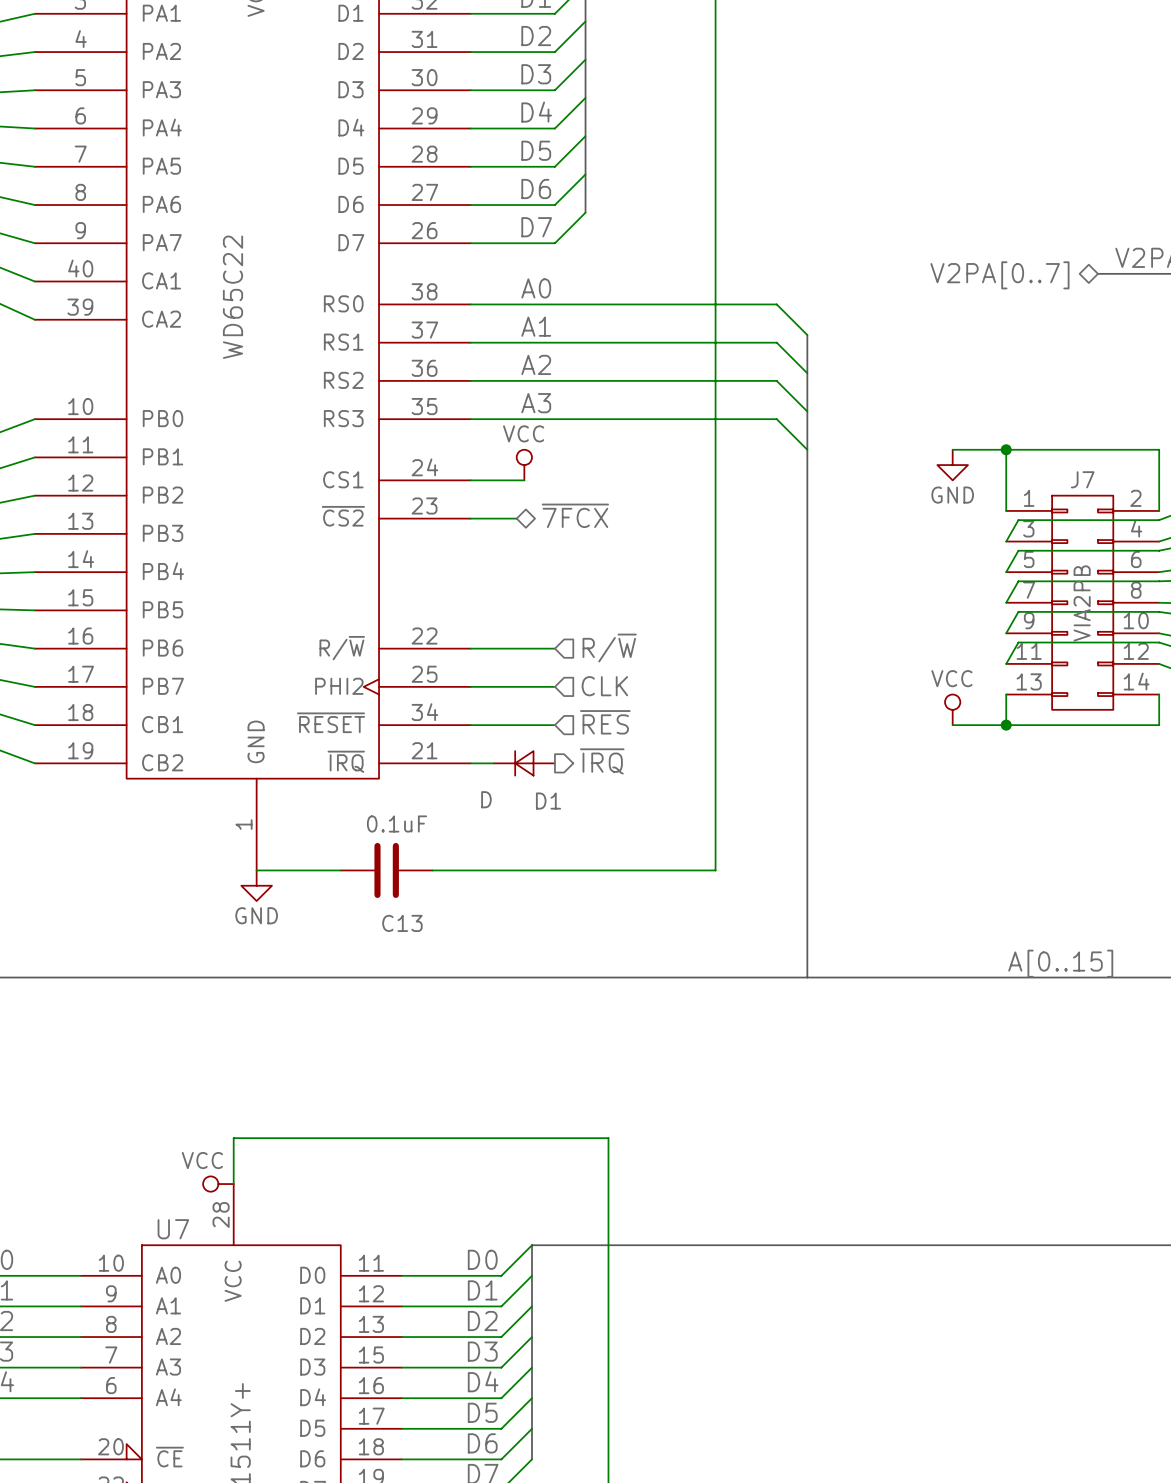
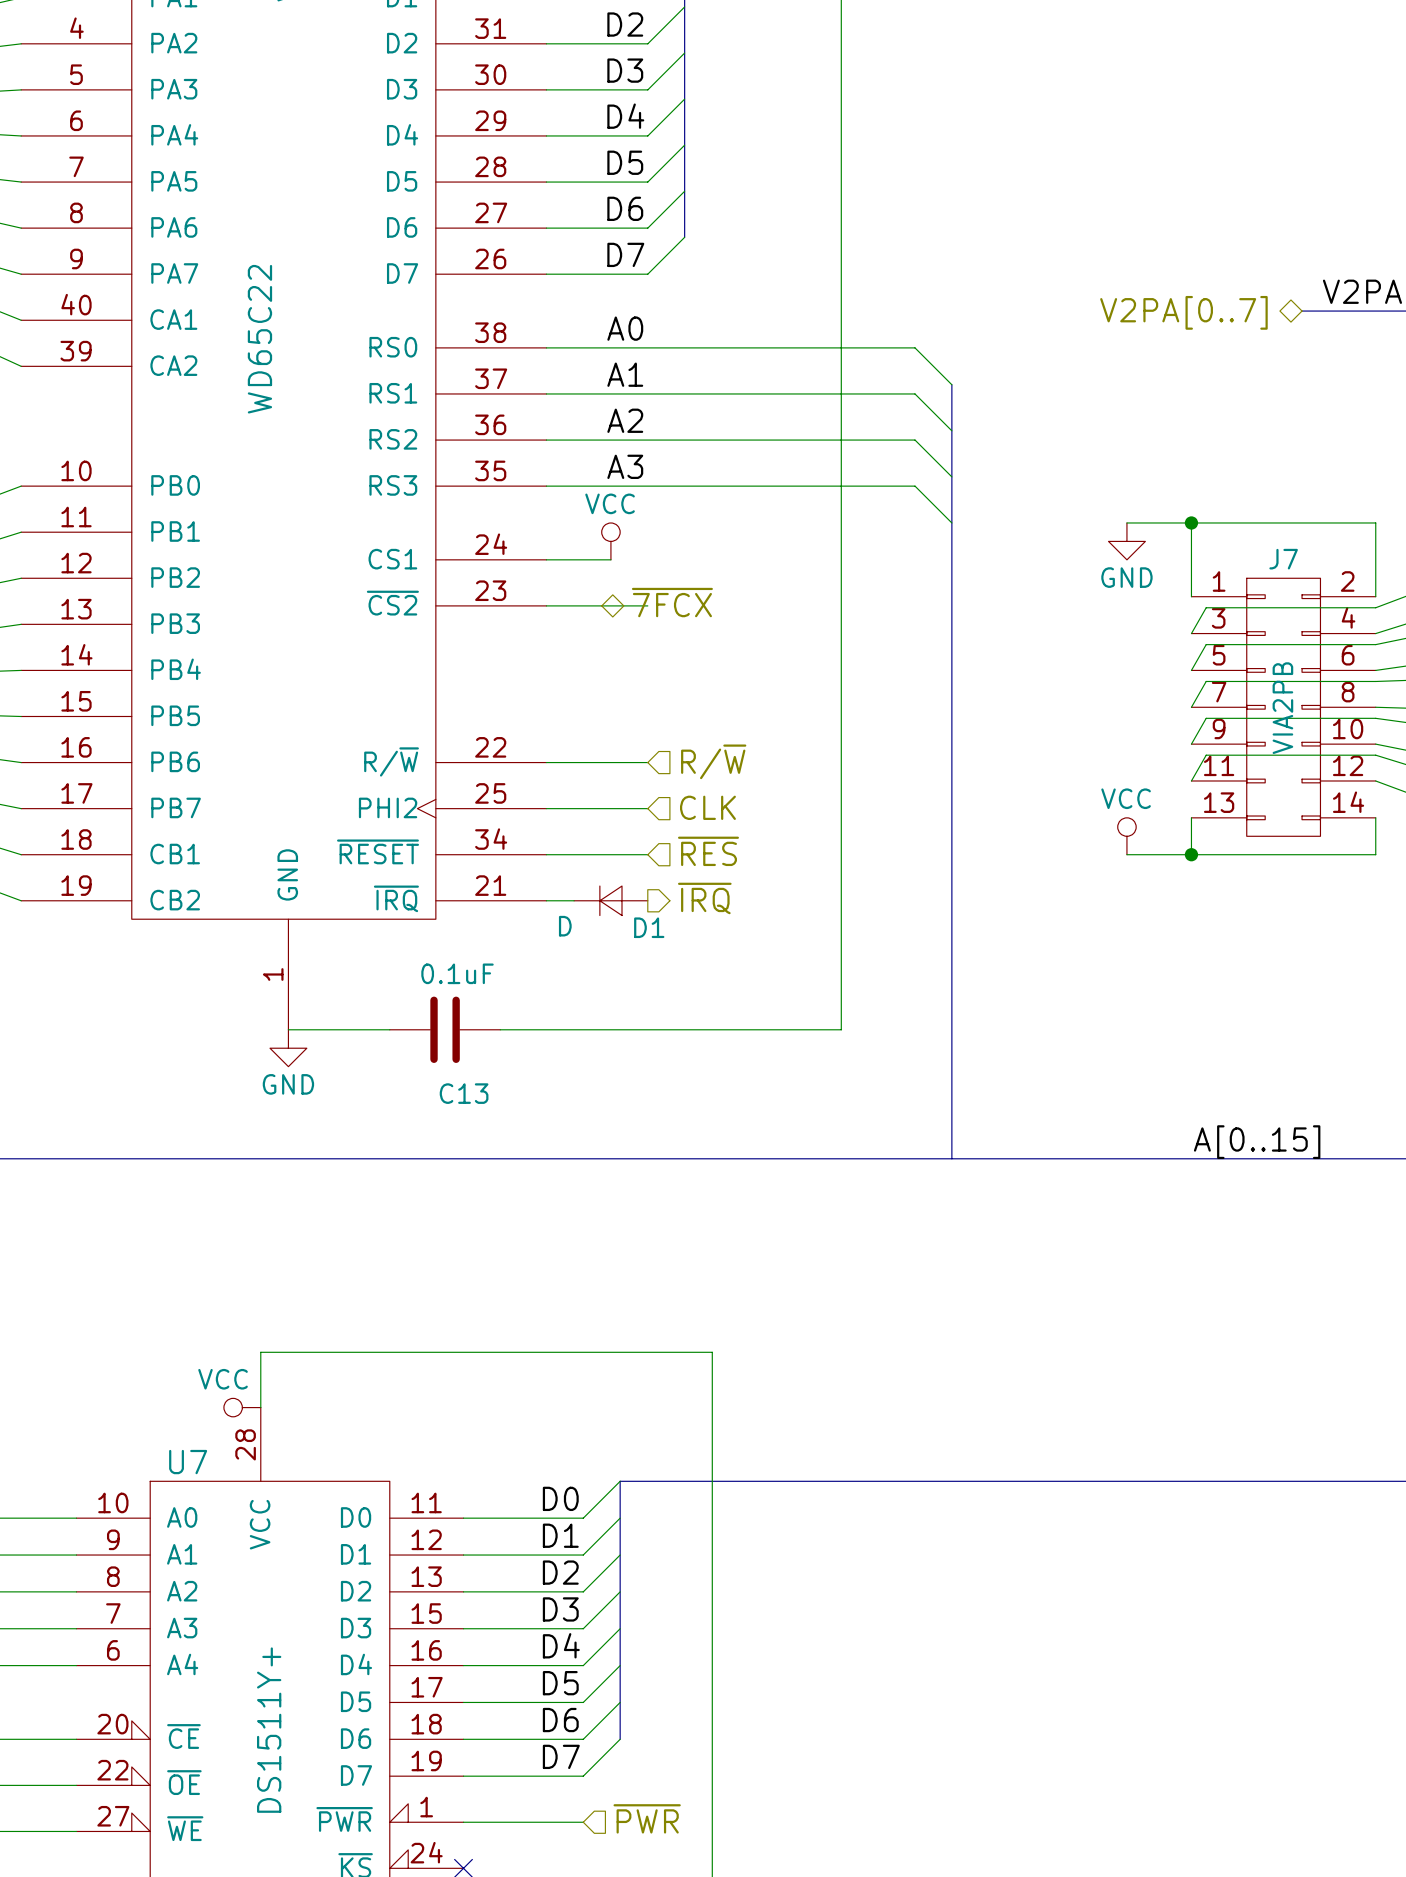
wire: none -> (601, 605) (647, 605)
D1 value position: D (486, 799) -> D (565, 926)
D1 name position: D1 (548, 801) -> D1 (649, 927)

